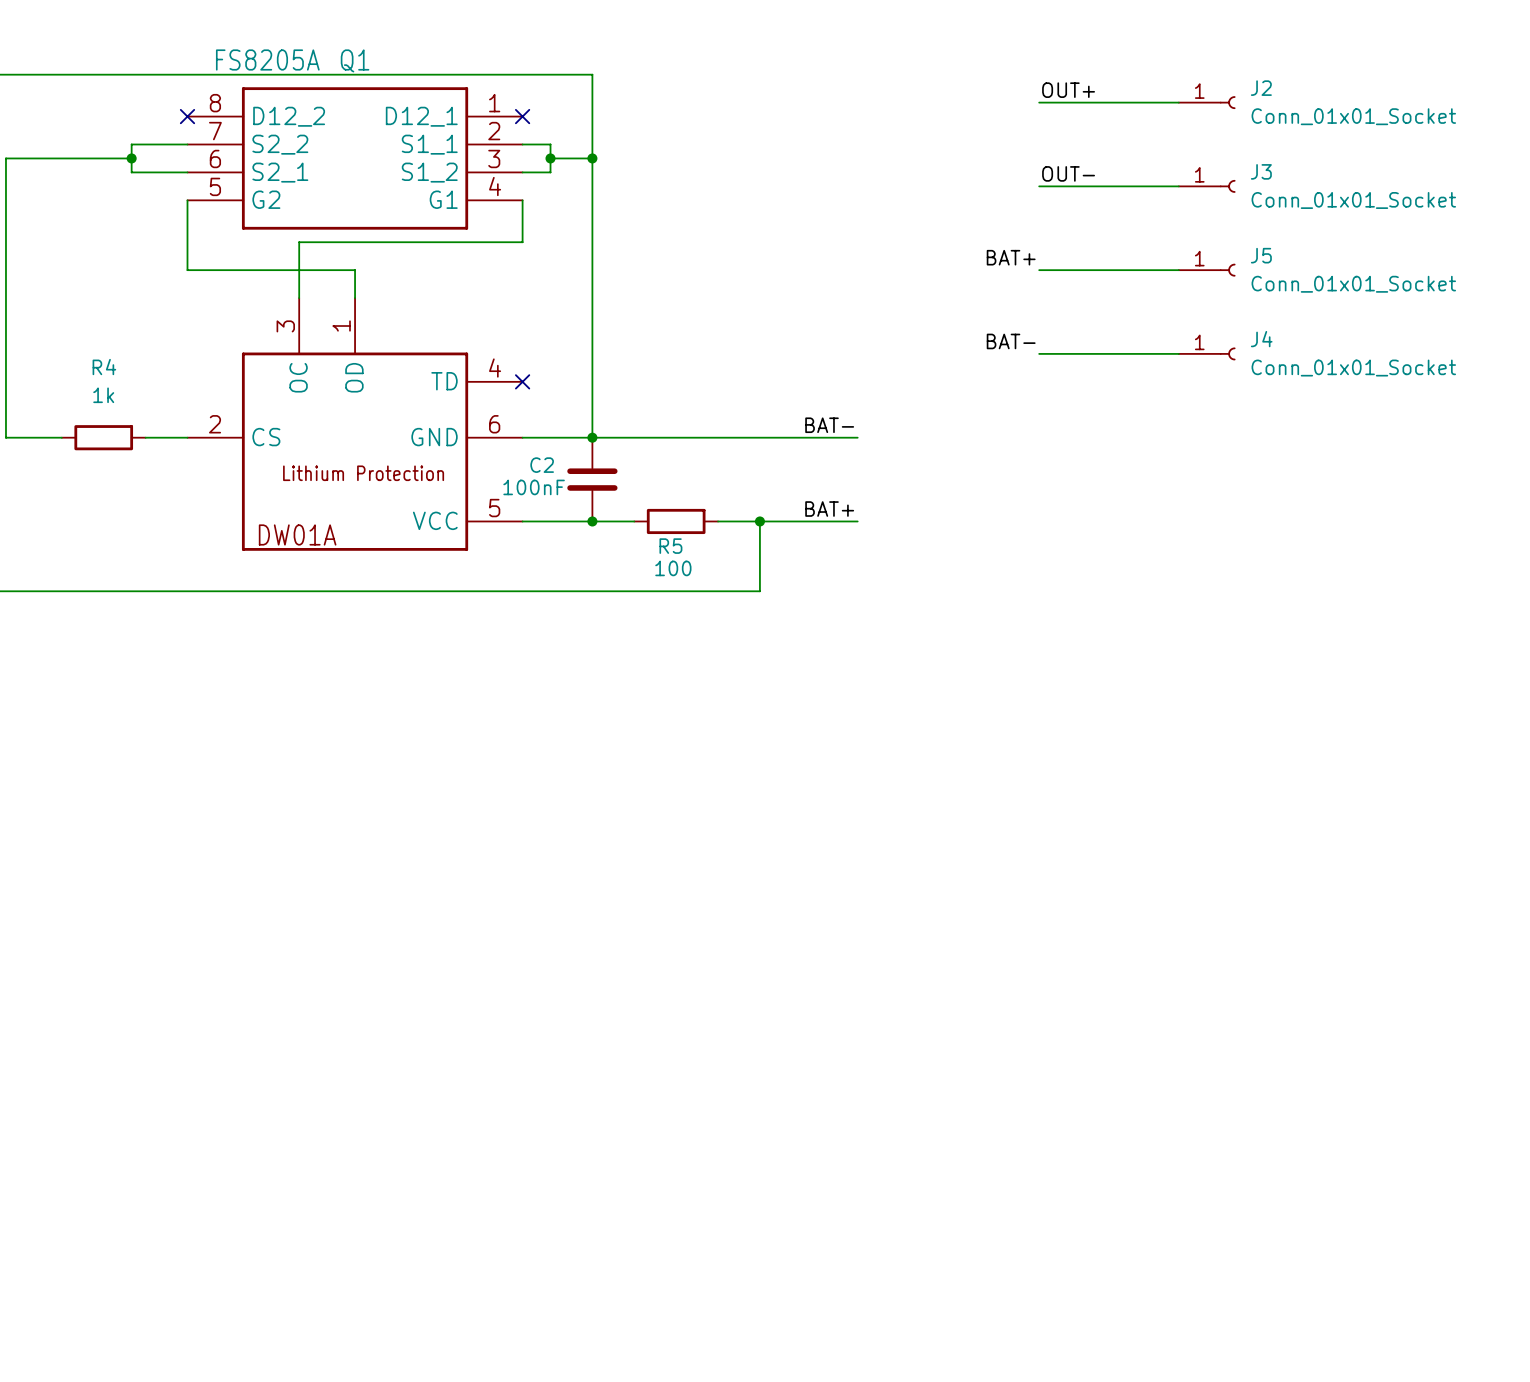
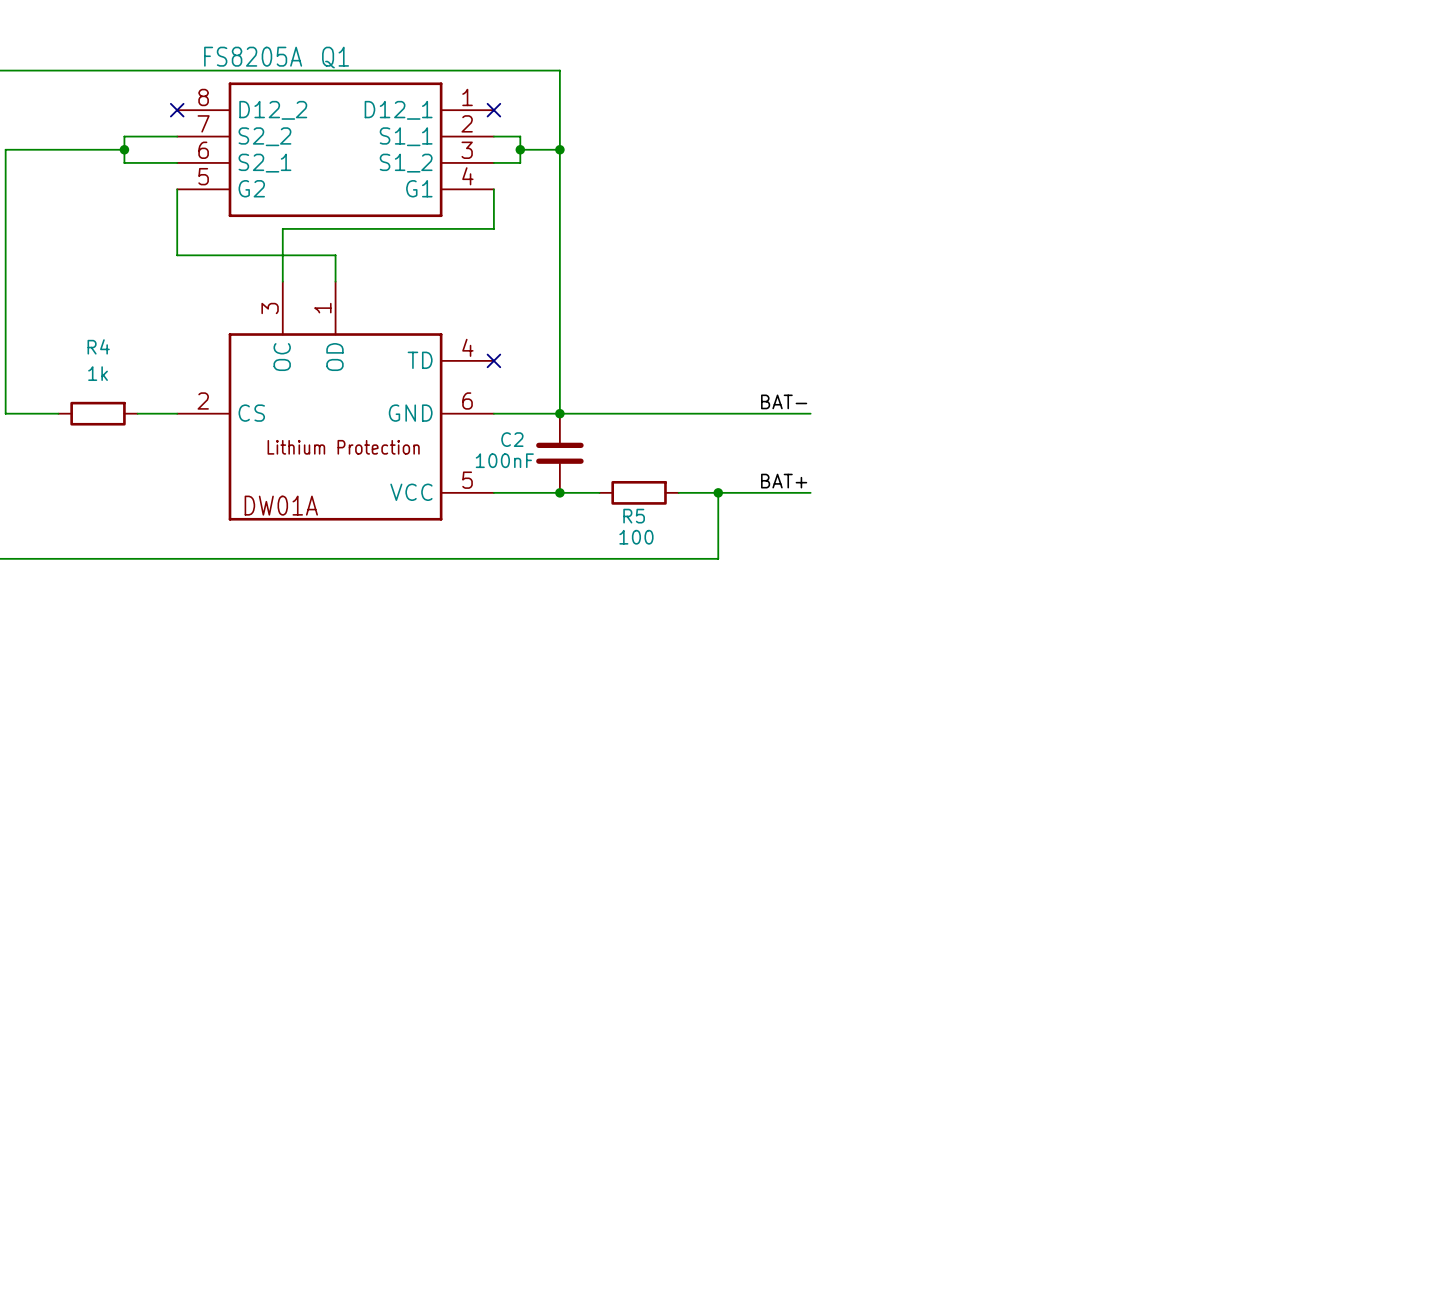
label: OUT+ (1068, 90) -> none
wire: (1039, 102) (1178, 102) -> none
J2: Conn_01x01_Socket (1207, 102) -> none
label: OUT- (1068, 173) -> none
wire: (1039, 186) (1178, 186) -> none
J3: Conn_01x01_Socket (1207, 186) -> none
label: BAT+ (1011, 257) -> none
wire: (1039, 270) (1178, 270) -> none
J5: Conn_01x01_Socket (1207, 270) -> none
label: BAT- (1011, 341) -> none
wire: (1039, 353) (1178, 353) -> none
J4: Conn_01x01_Socket (1207, 353) -> none

